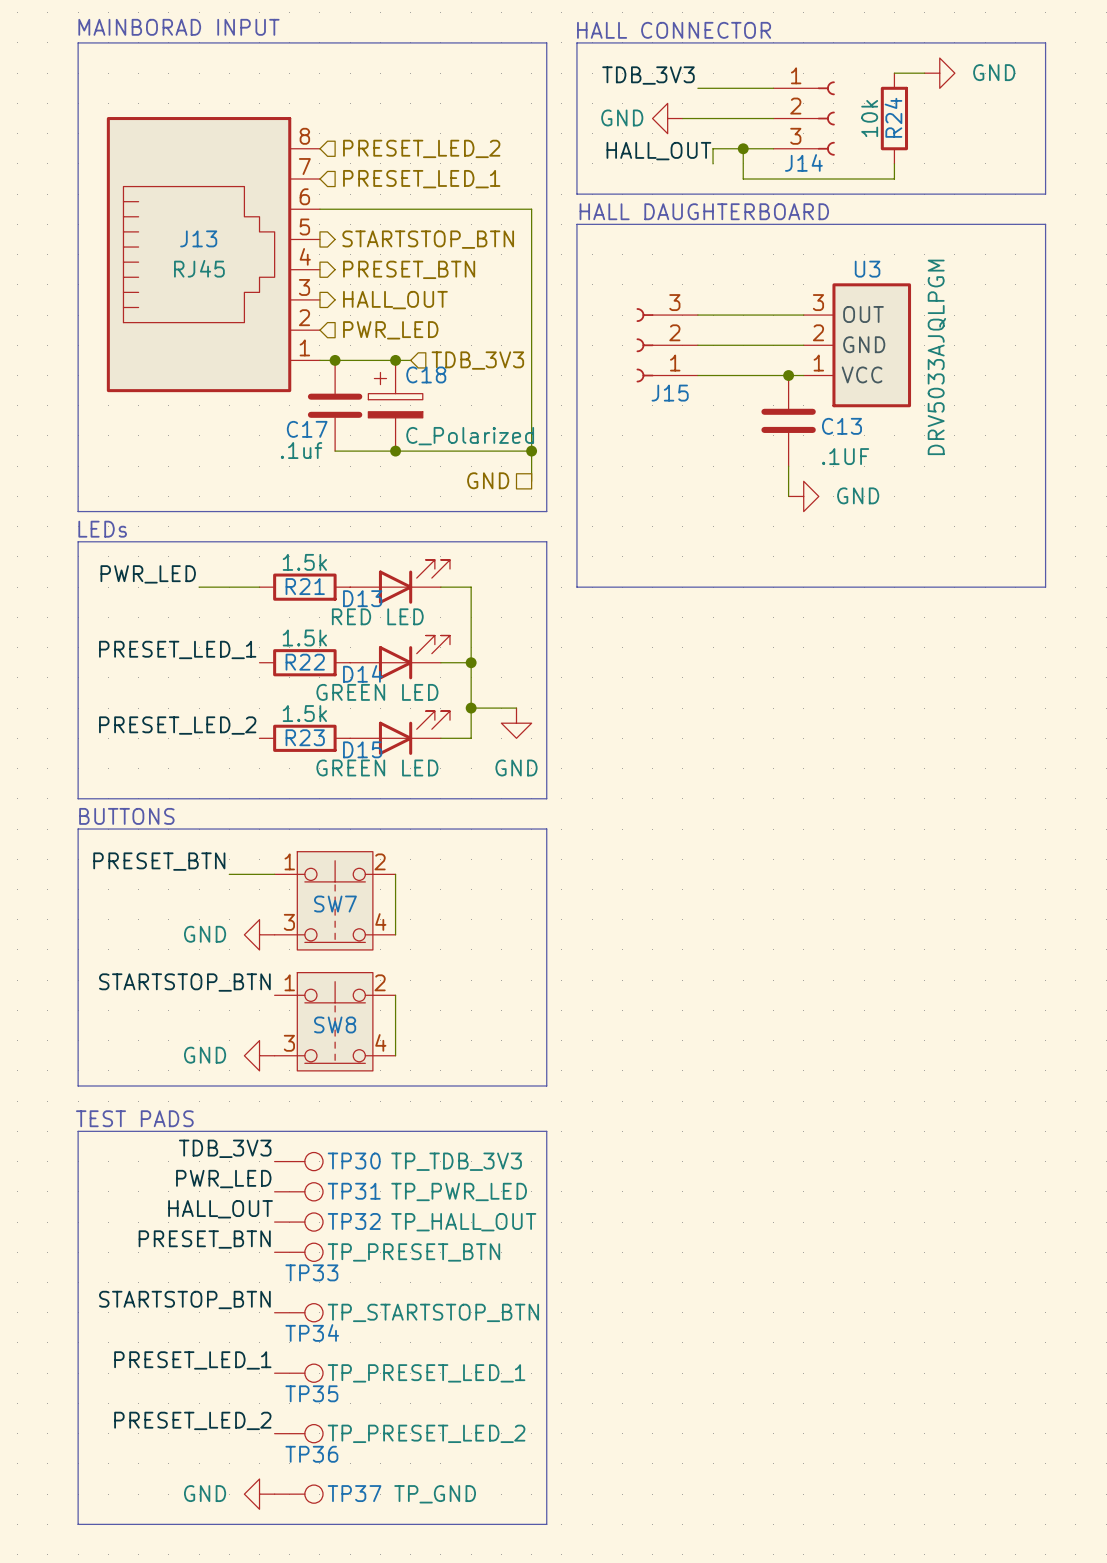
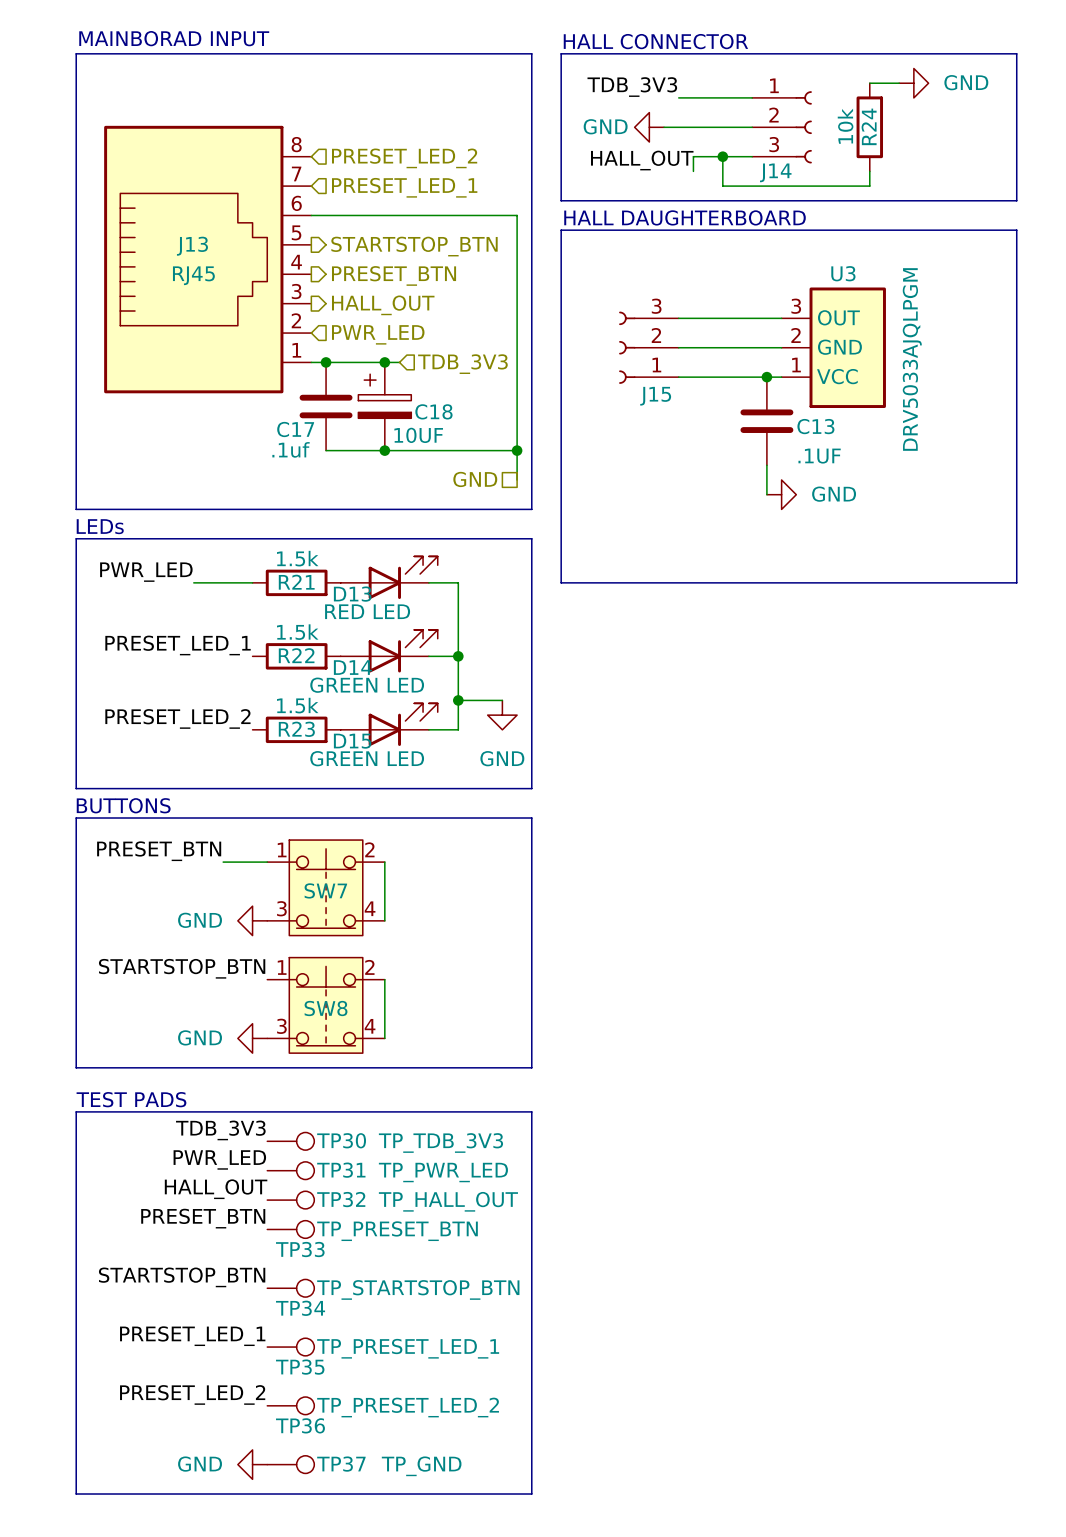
C18 name position: C18 (426, 374) -> C18 (433, 411)
C18 value: C_Polarized (470, 436) -> 10UF (418, 435)

